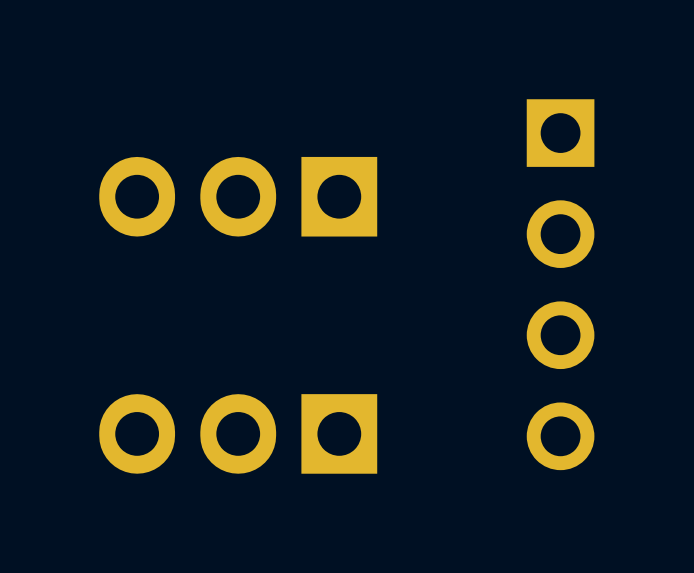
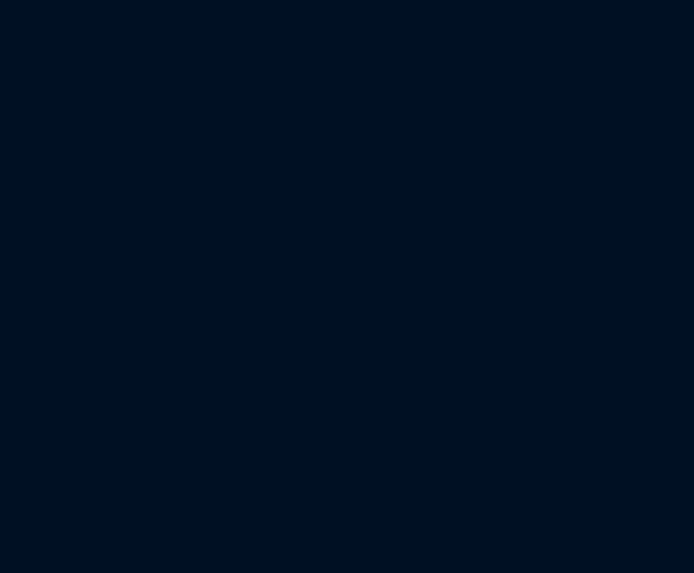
part: (238, 196) -> none
part: (560, 284) -> none
part: (238, 433) -> none

